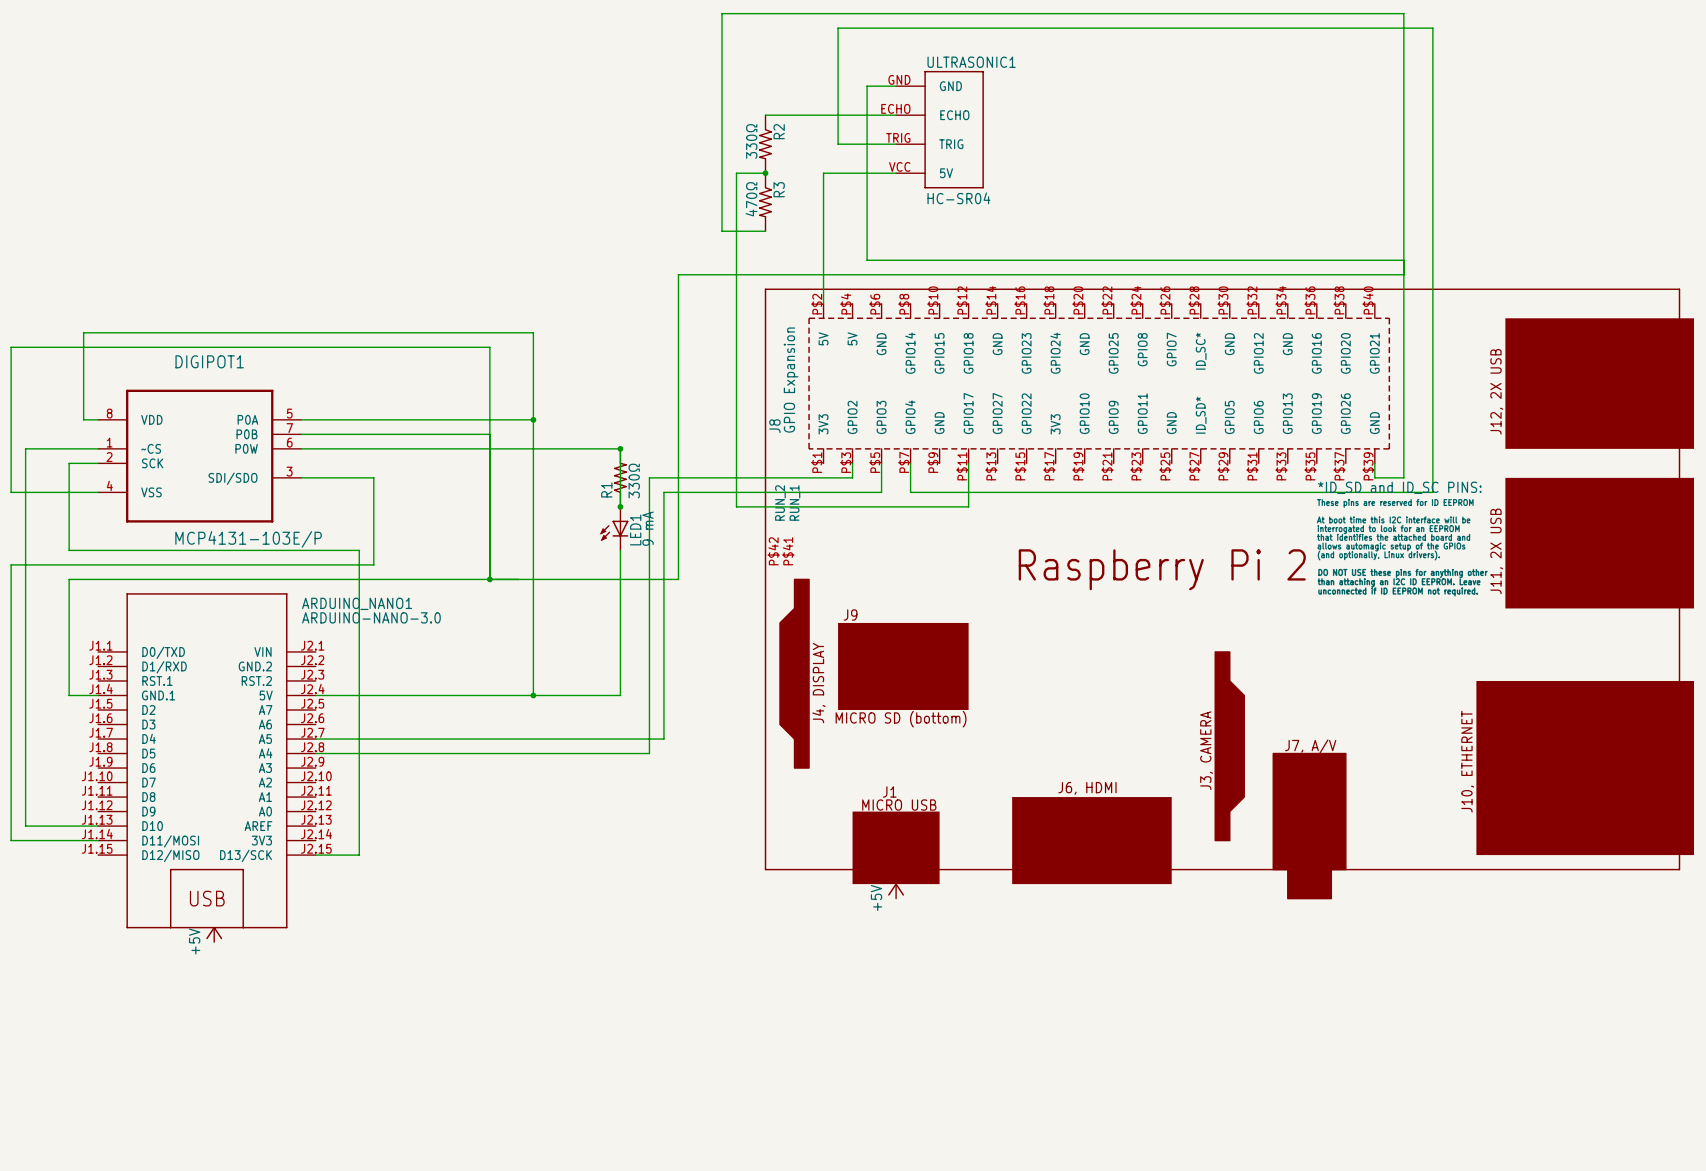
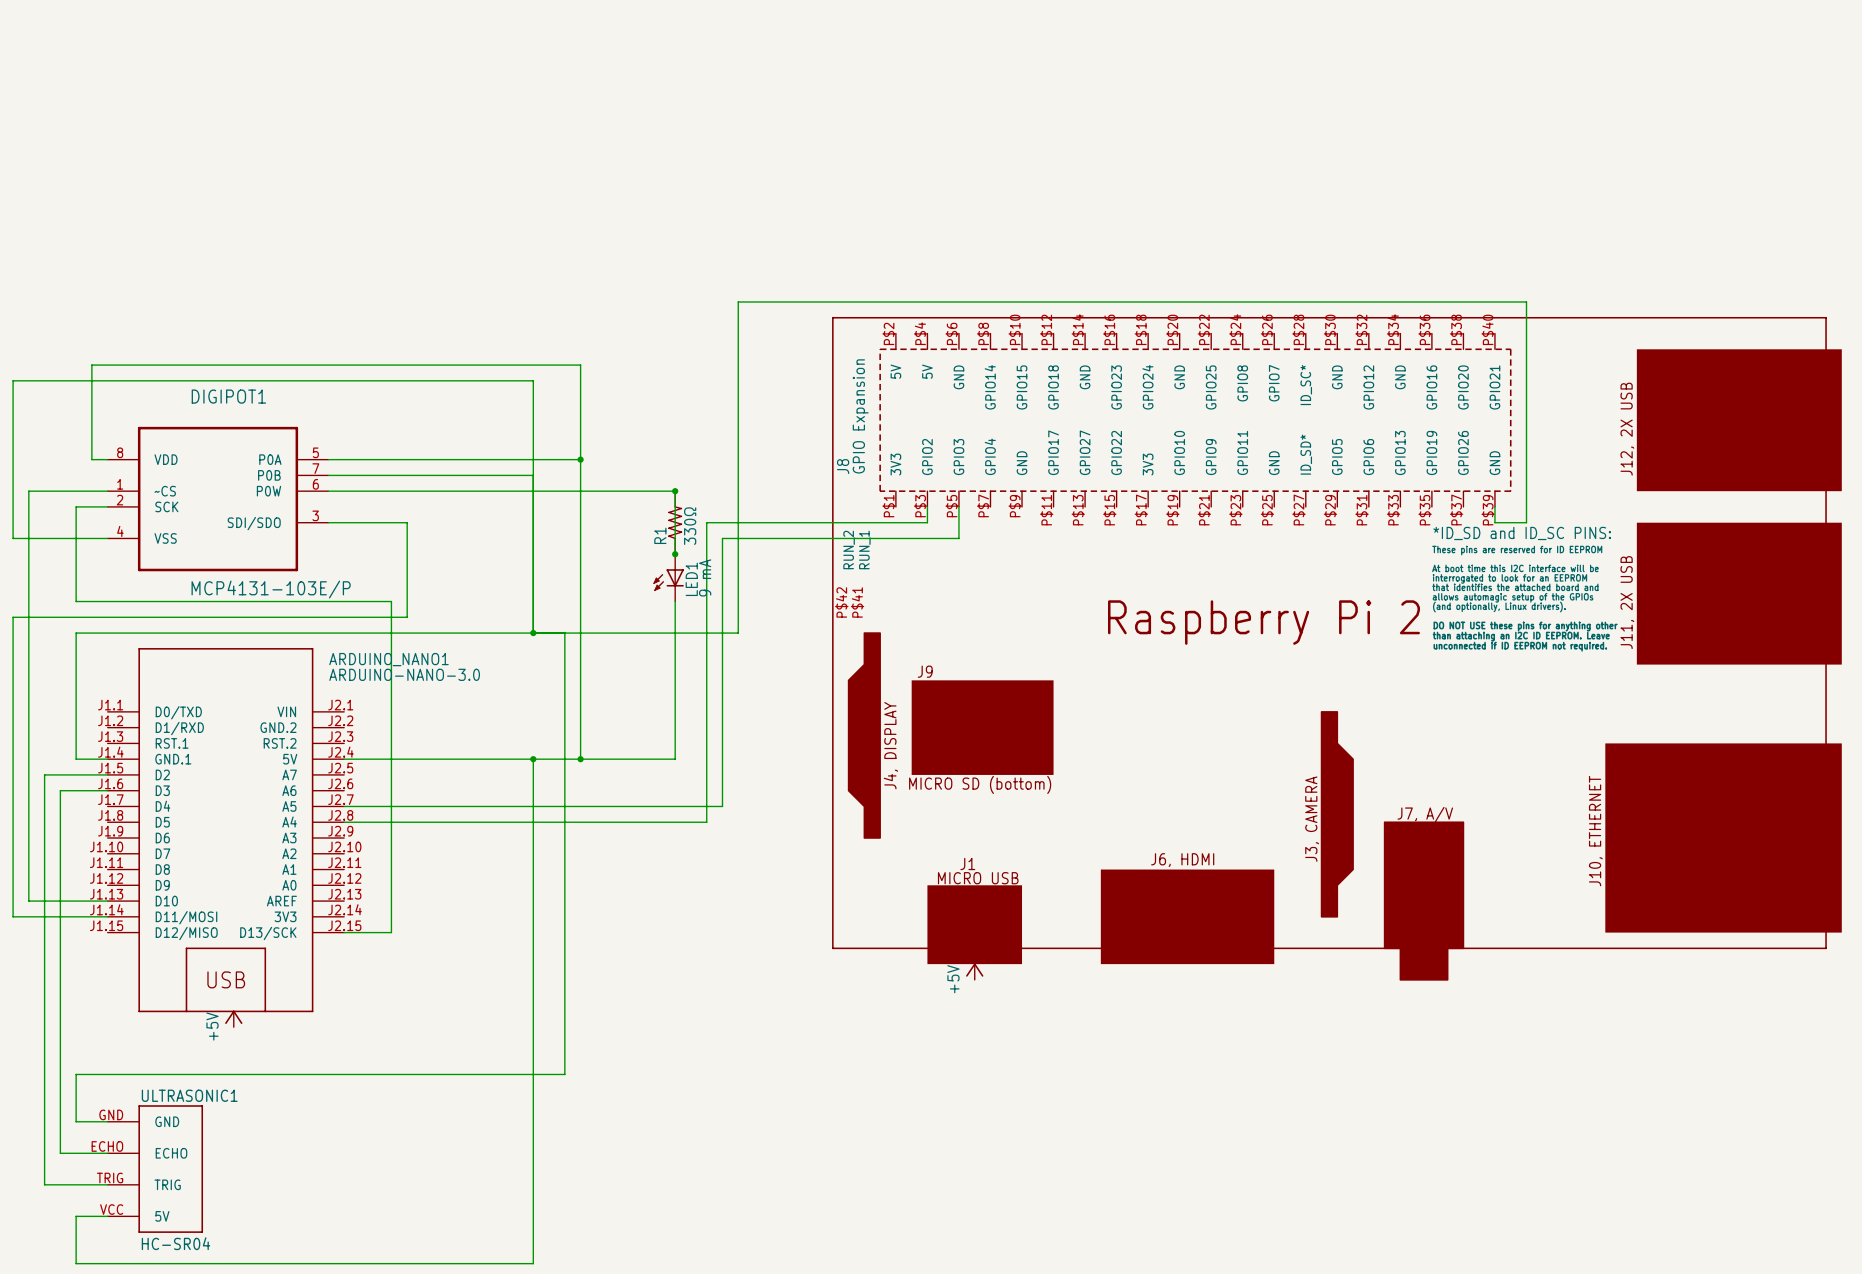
wire: (896, 86) (867, 86) (867, 260) (1403, 260) -> none
wire: (765, 115) (896, 115) -> none
ULTRASONIC1 position: (939, 129) -> (155, 1169)
R2: 330Ω (765, 144) -> none
wire: (896, 144) (838, 144) (838, 28) (1432, 28) (1432, 492) (910, 492) (910, 463) -> none
wire: (765, 173) (736, 173) (736, 506) (968, 506) (968, 463) -> none
junction: (765, 173) -> none
wire: (896, 173) (823, 173) (823, 303) -> none
R3: 470Ω (765, 202) -> none
wire: (765, 231) (721, 231) (721, 13) (1403, 13) (1403, 274) -> none
wire: none -> (564, 633) (564, 1074) (76, 1074) (76, 1121) (107, 1121)
wire: none -> (533, 759) (533, 1263) (76, 1263) (76, 1216) (107, 1216)
junction: none -> (533, 759)
wire: none -> (107, 774) (44, 774) (44, 1184) (107, 1184)
wire: none -> (107, 790) (60, 790) (60, 1153) (107, 1153)

